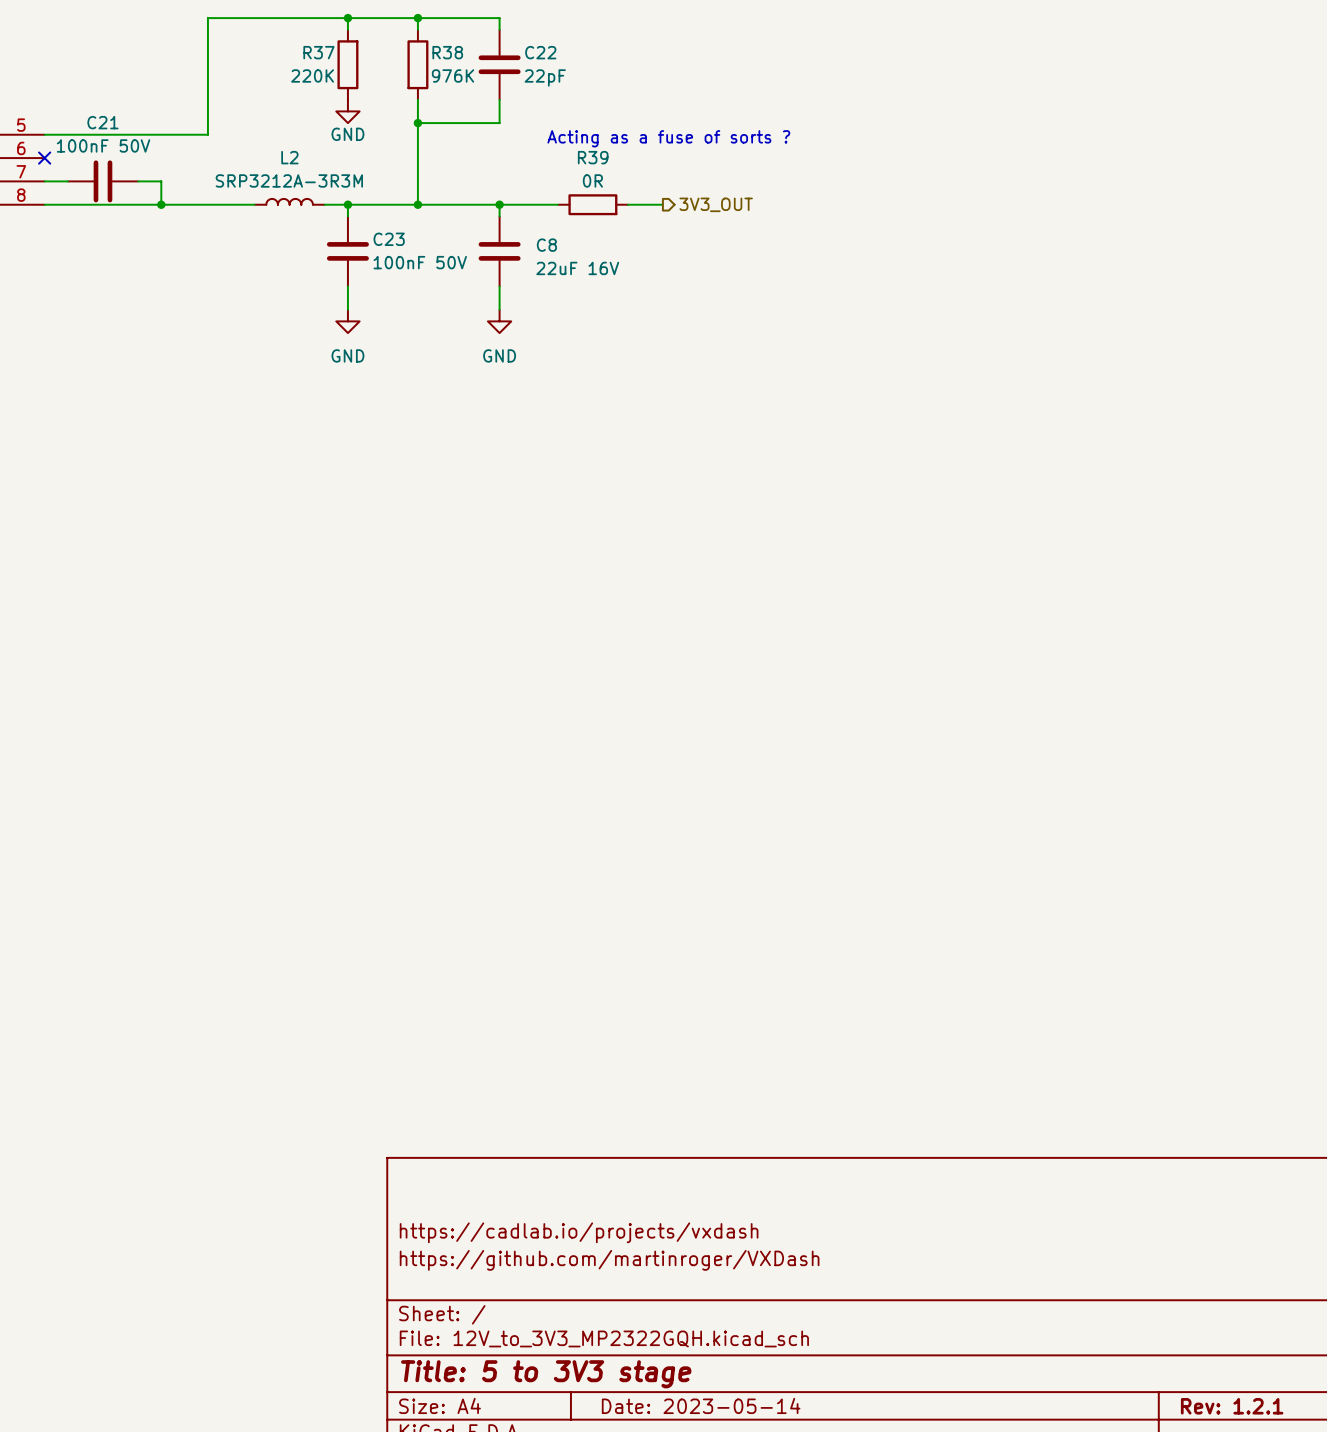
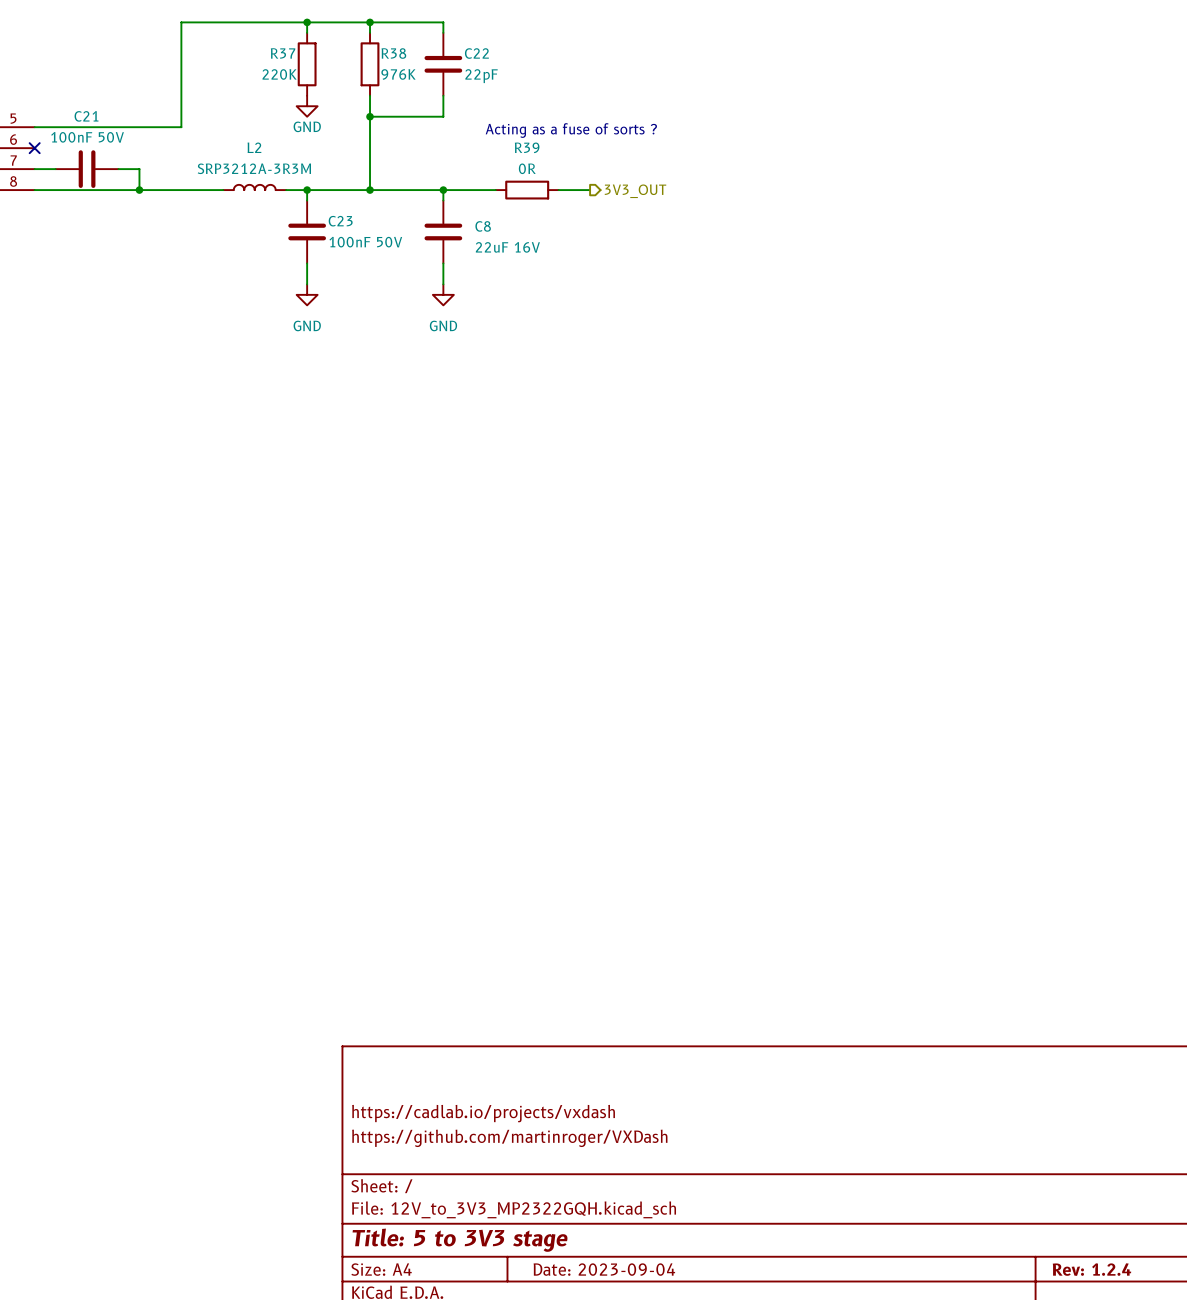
title block: Date: 2023-05-14 (701, 1405) -> Date: 2023-09-04 (604, 1269)
title block: Rev: 1.2.1 (1232, 1406) -> Rev: 1.2.4 (1091, 1269)

